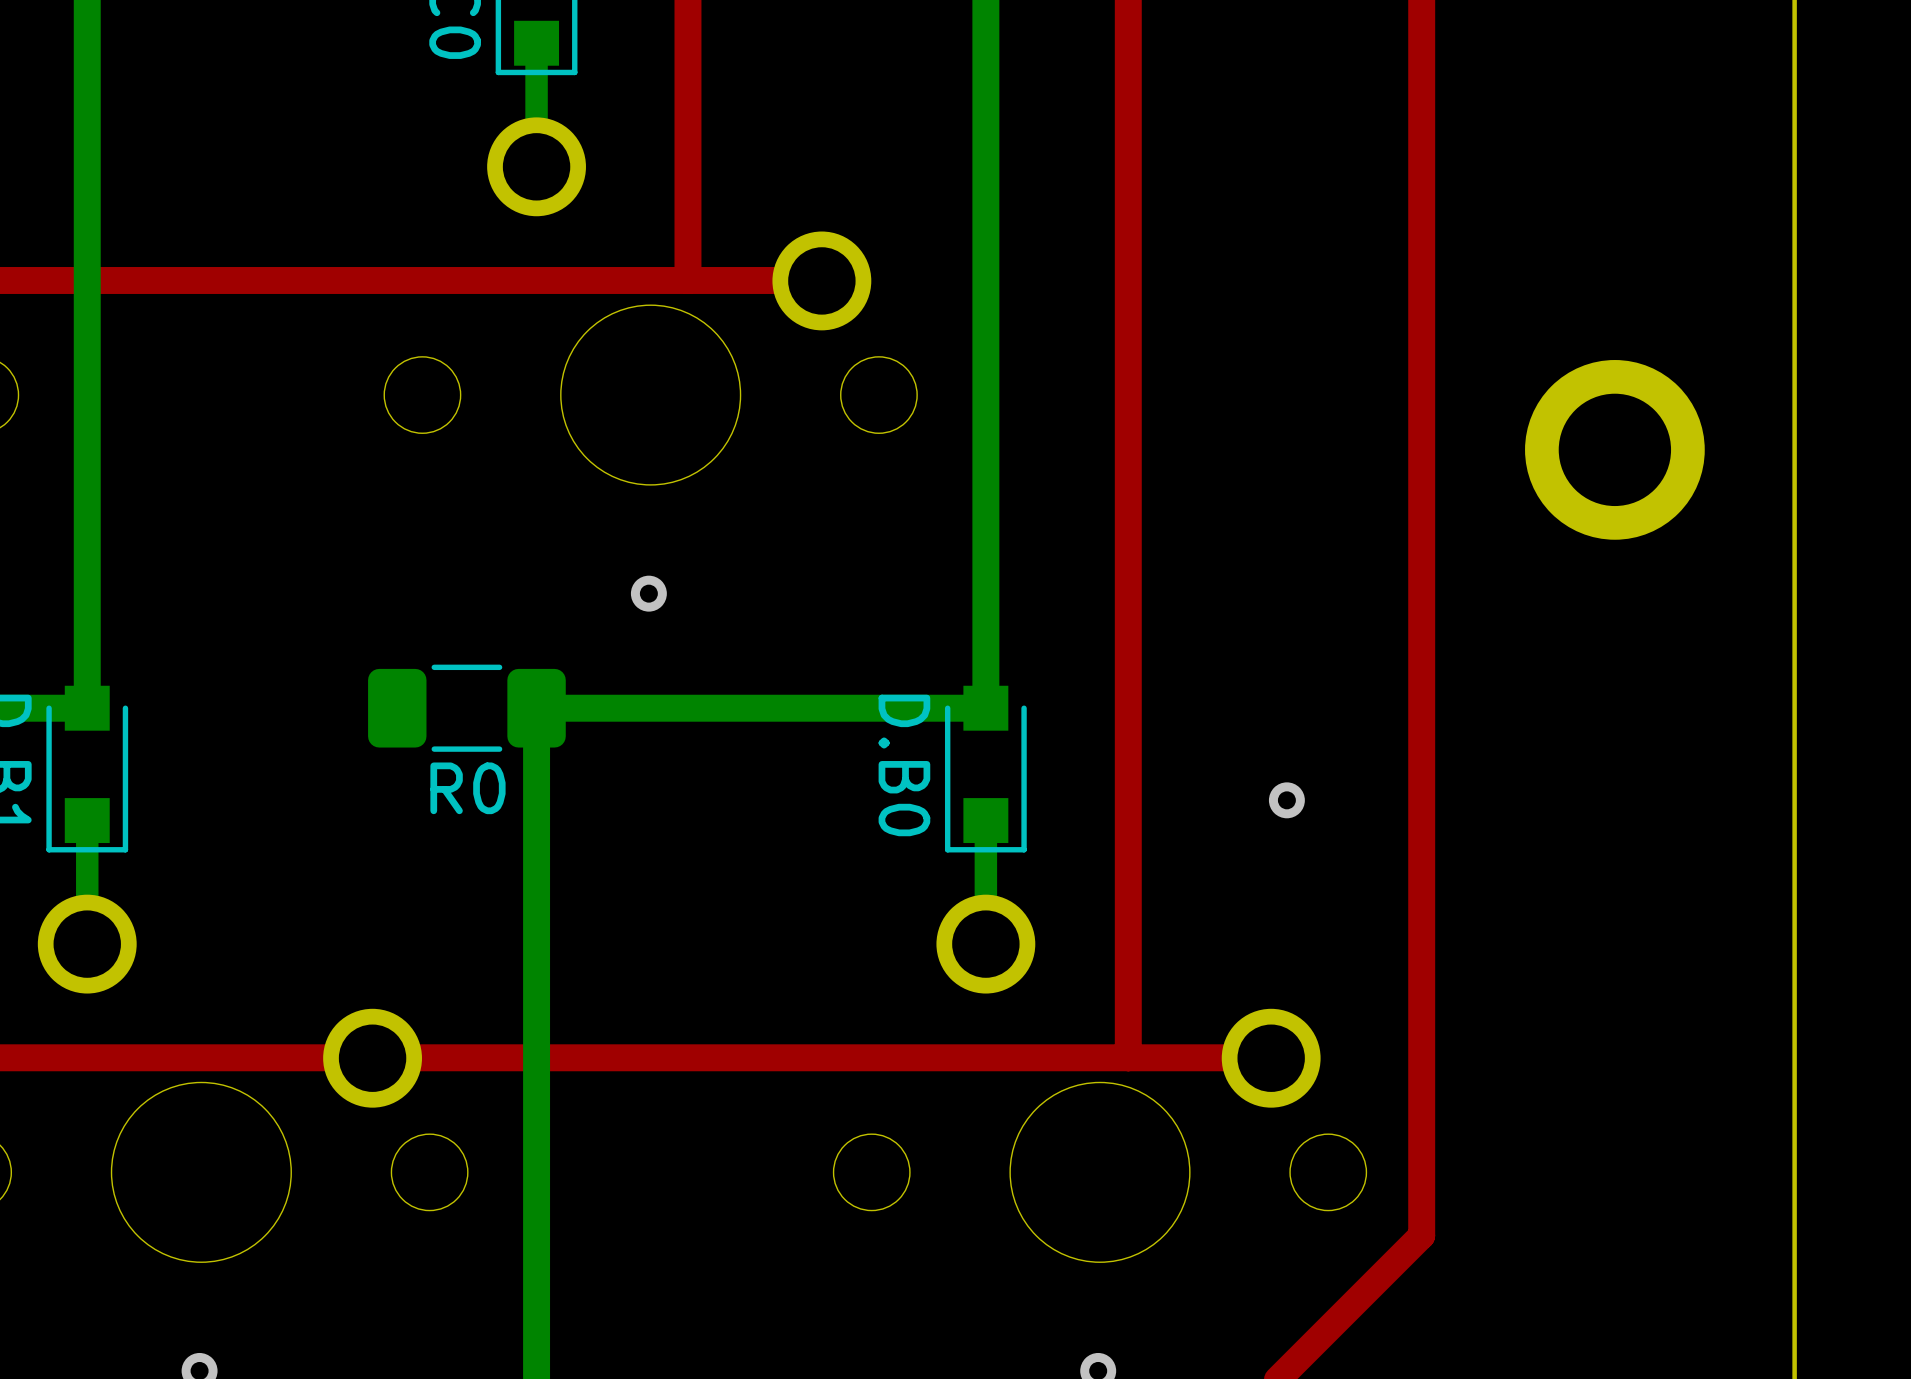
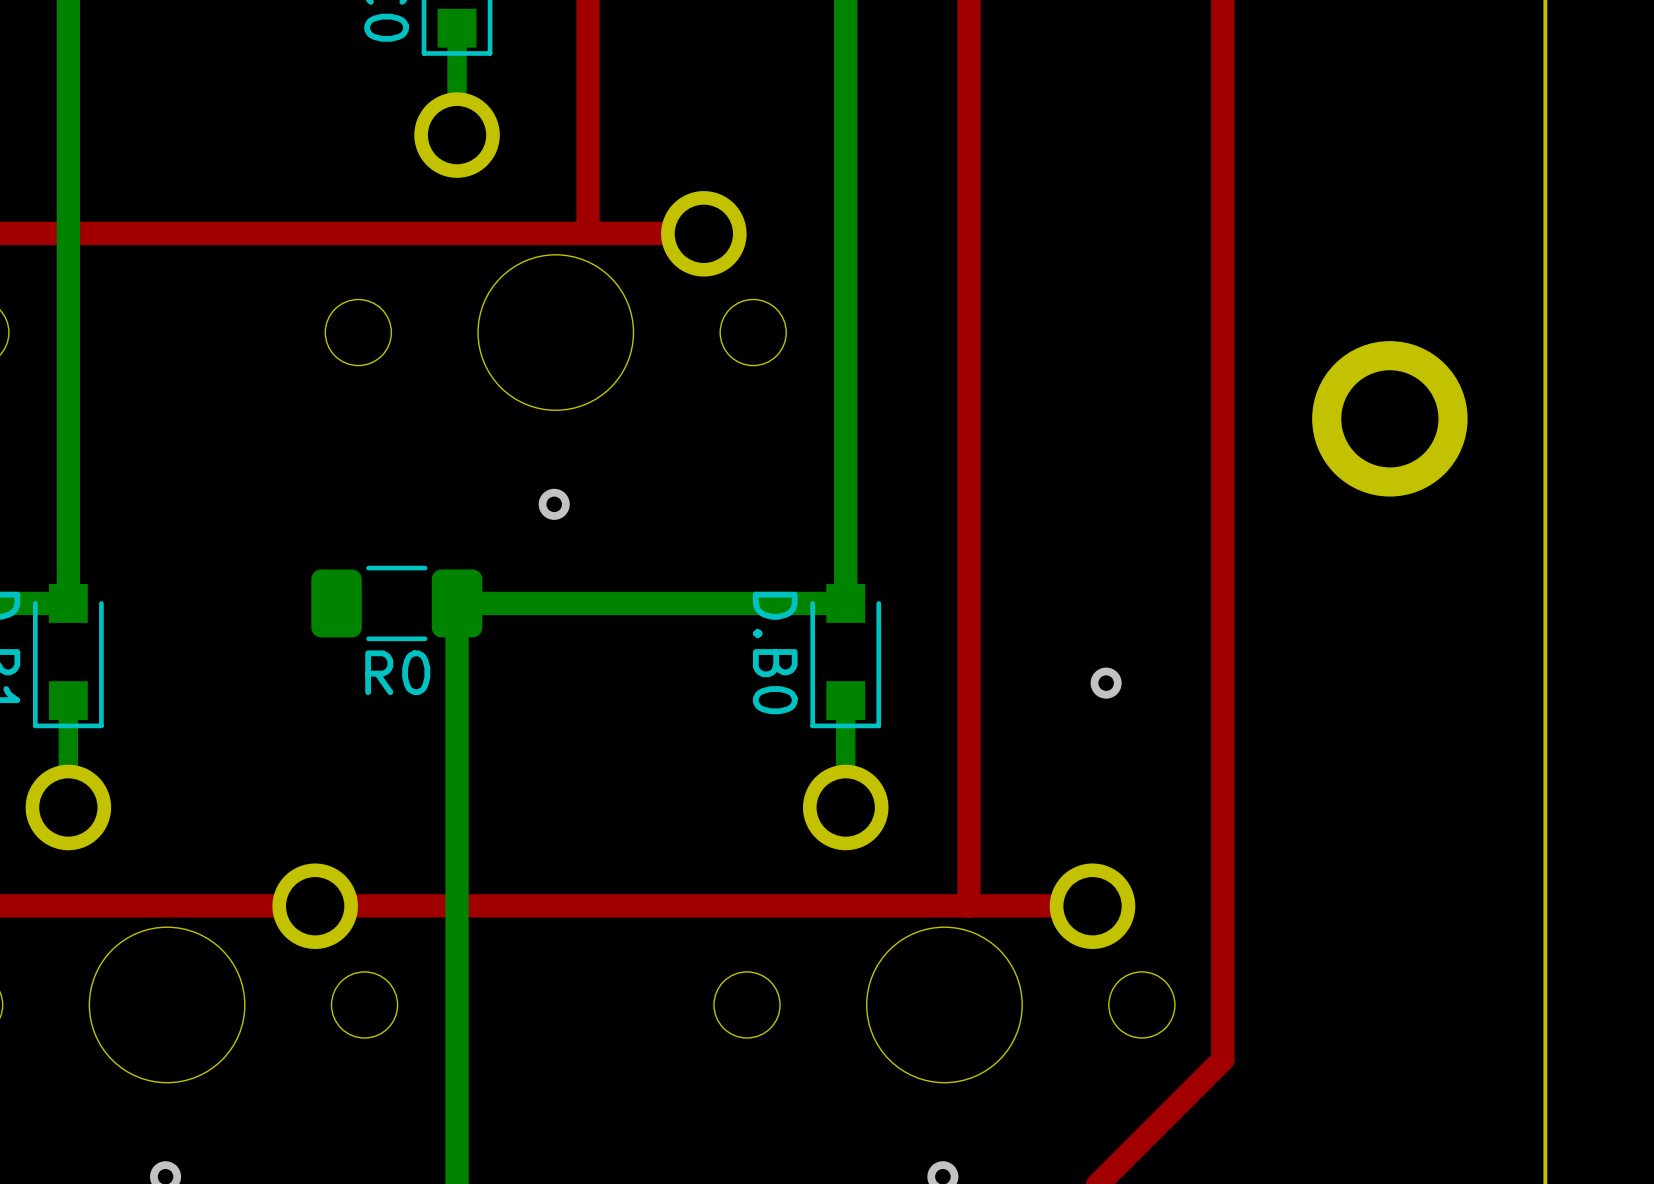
part position: (1614, 449) -> (1389, 418)

